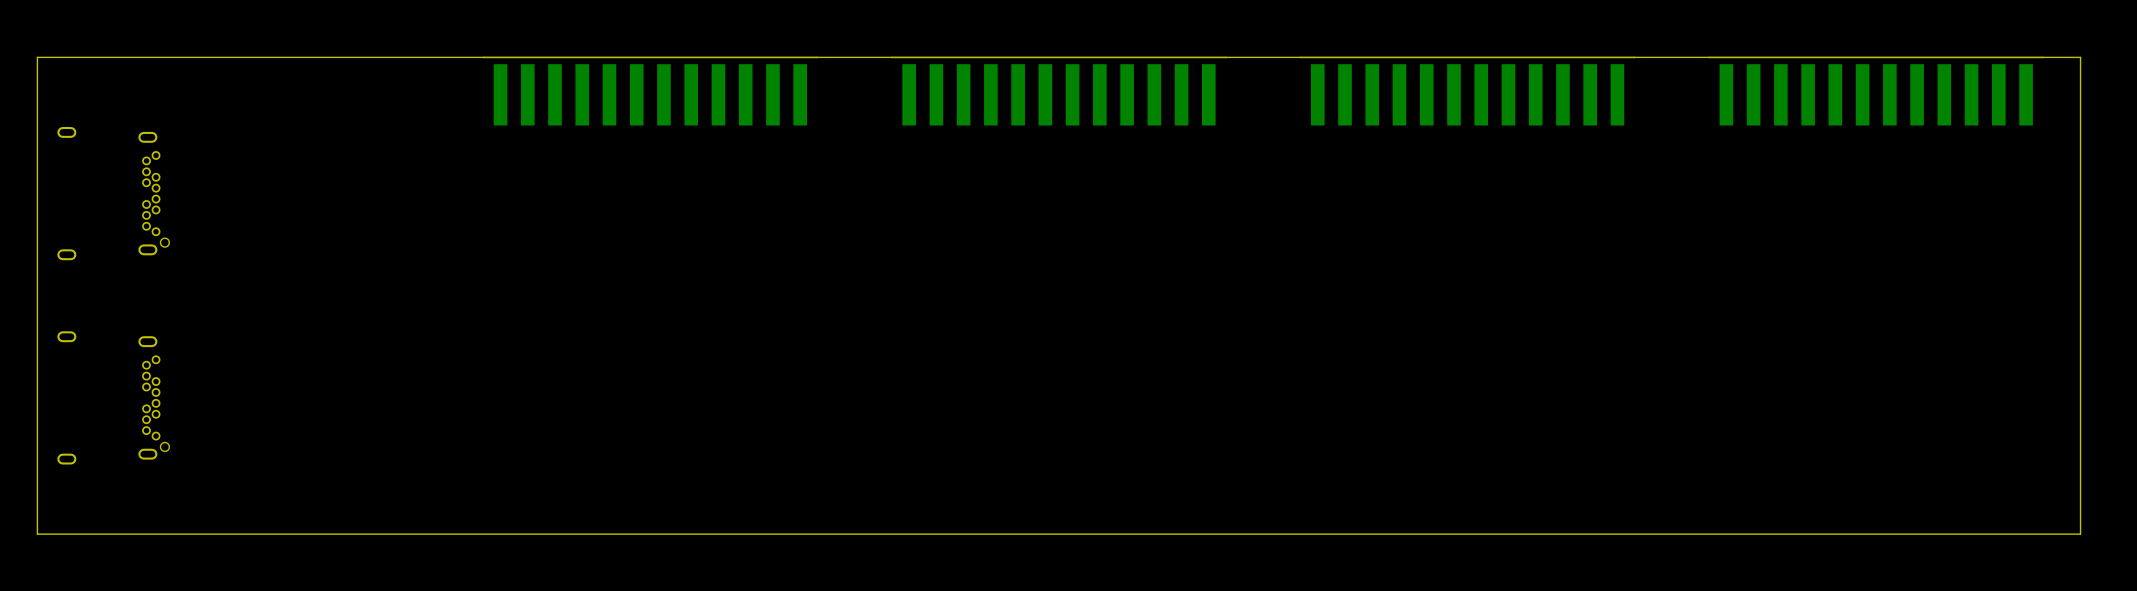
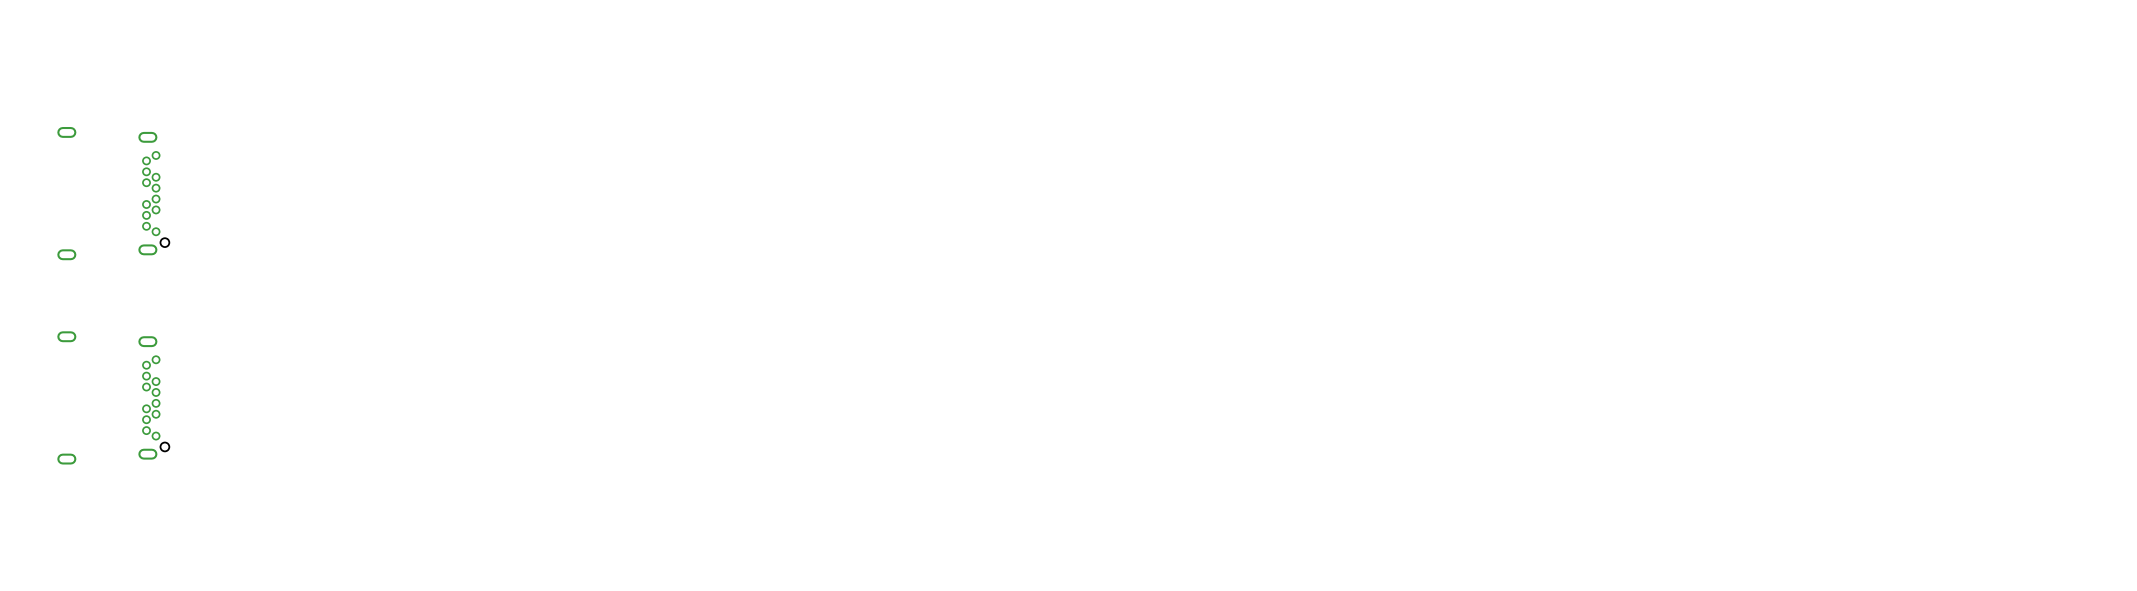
board edge: (891, 57) (817, 57) -> none
board edge: (1300, 57) (1226, 57) -> none
board edge: (1709, 57) (1634, 57) -> none
board edge: (2043, 57) (2080, 57) (2080, 534) (37, 534) (37, 57) (483, 57) -> none
part: (650, 91) -> none
part: (1058, 91) -> none
part: (1467, 91) -> none
part: (1876, 91) -> none

